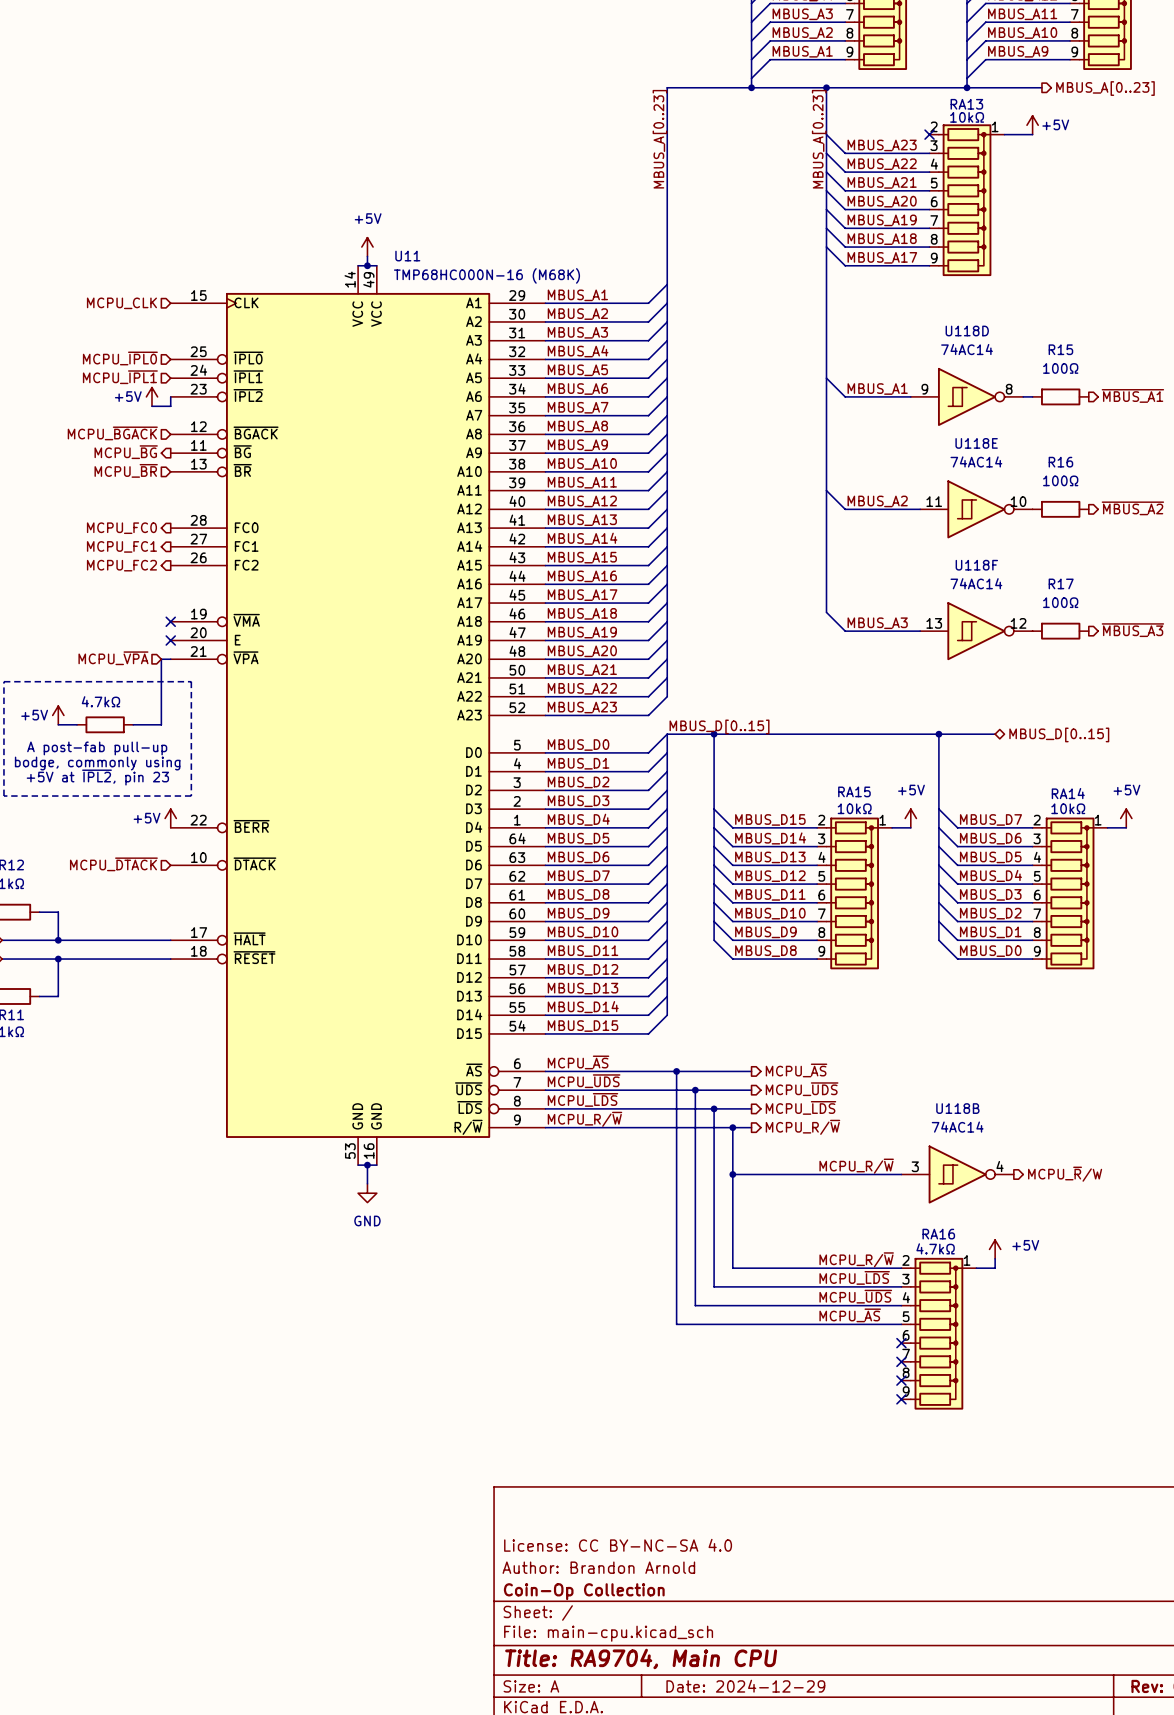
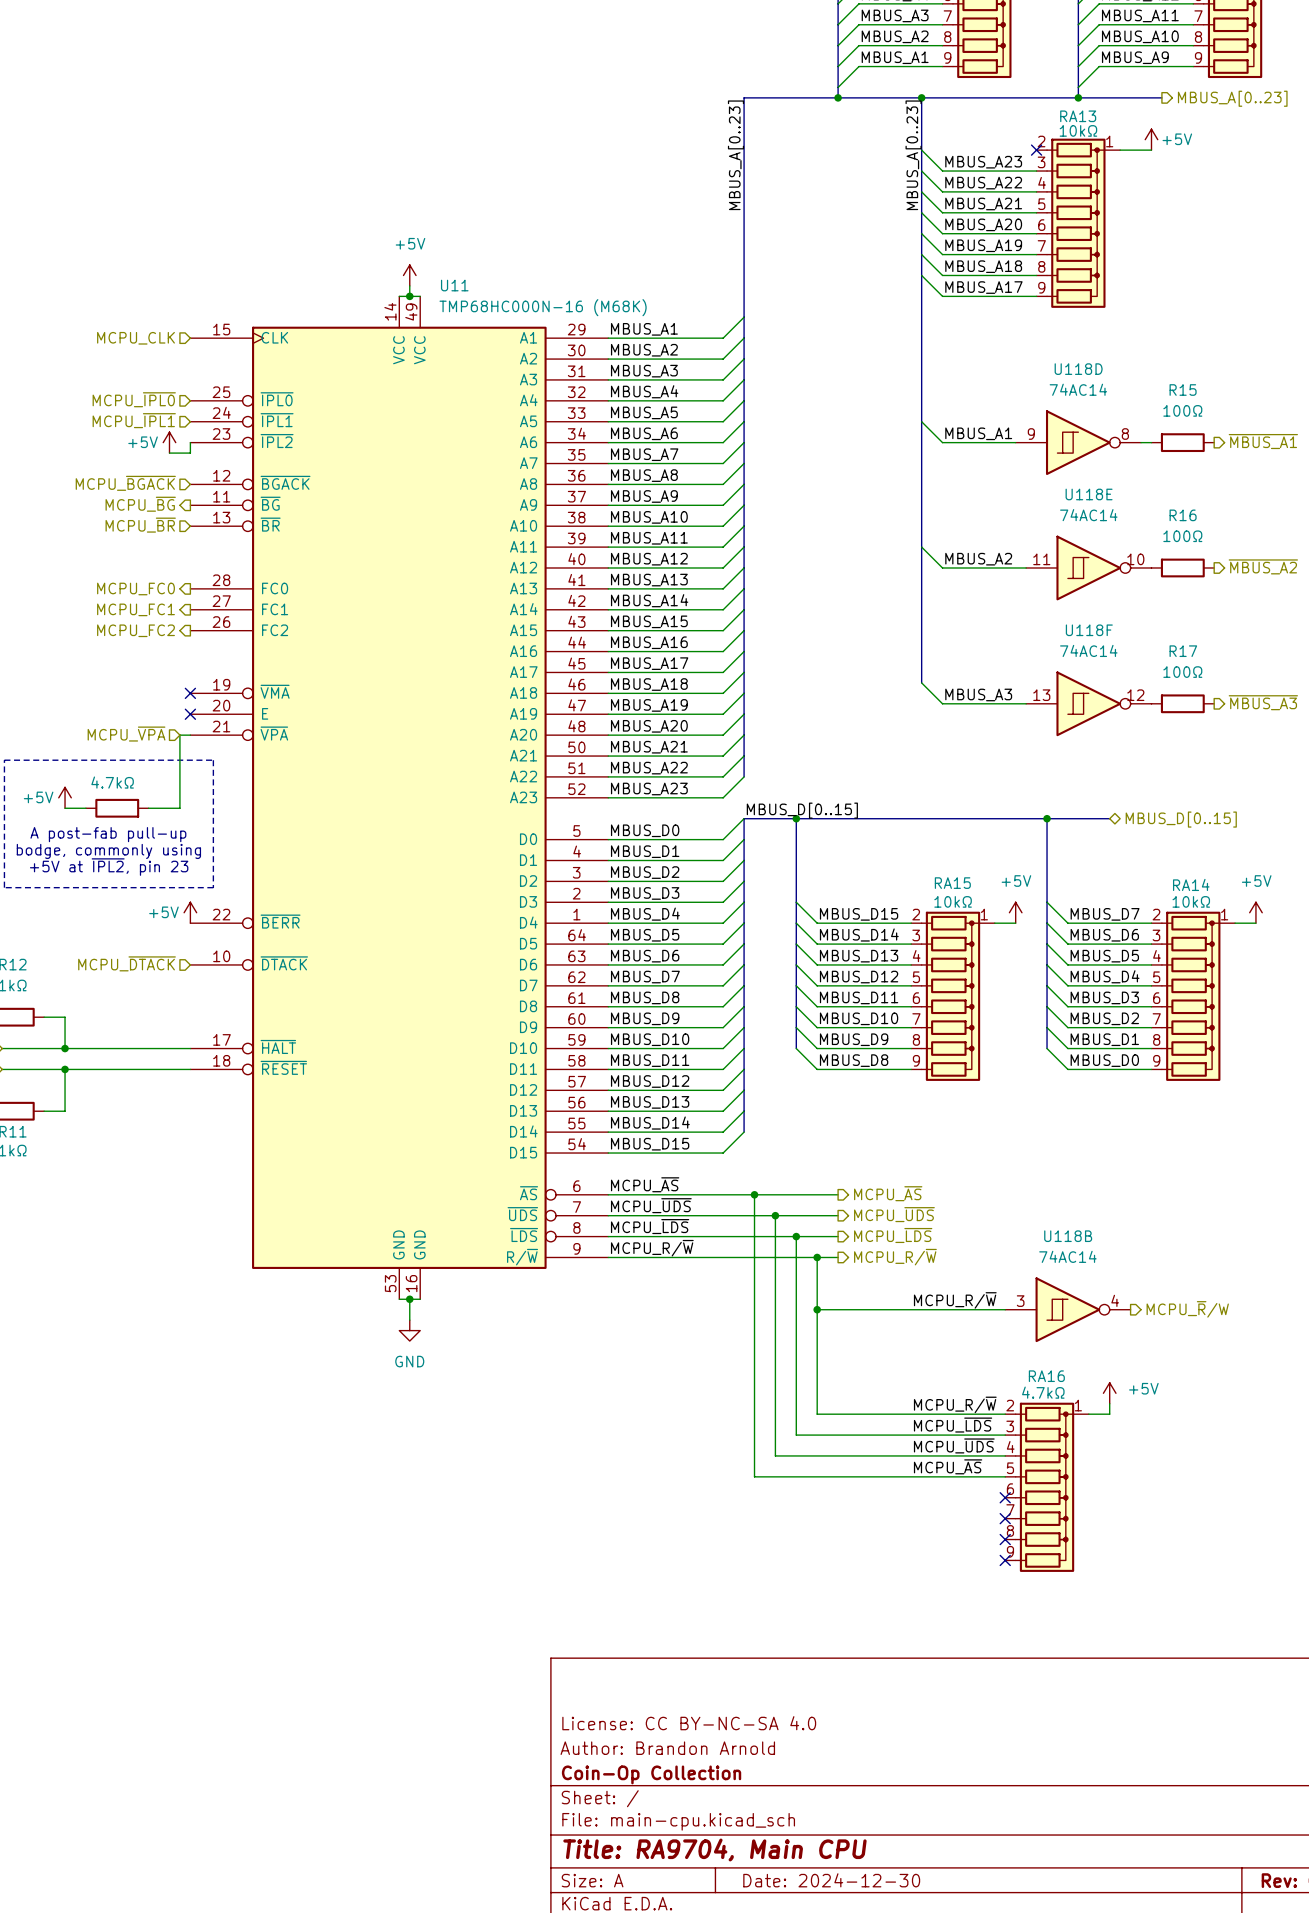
title block: Date: 2024-12-29 (745, 1686) -> Date: 2024-12-30 (831, 1880)

